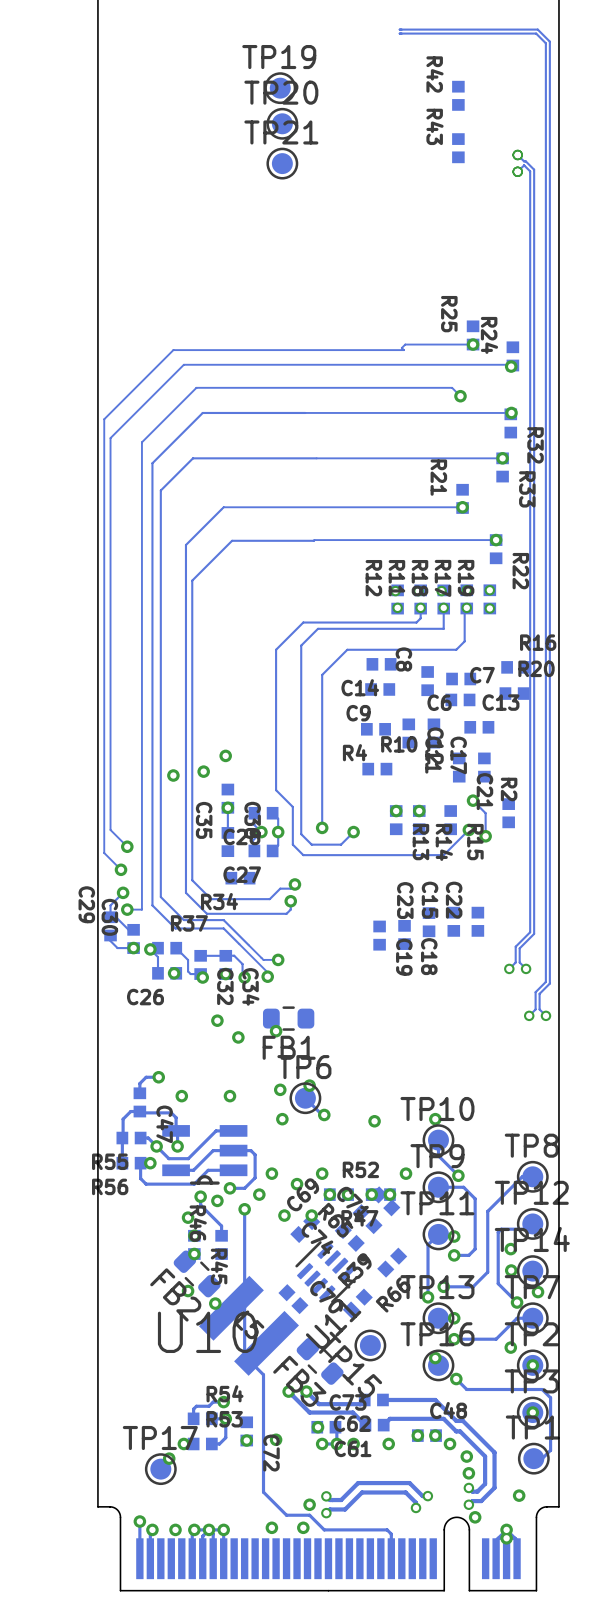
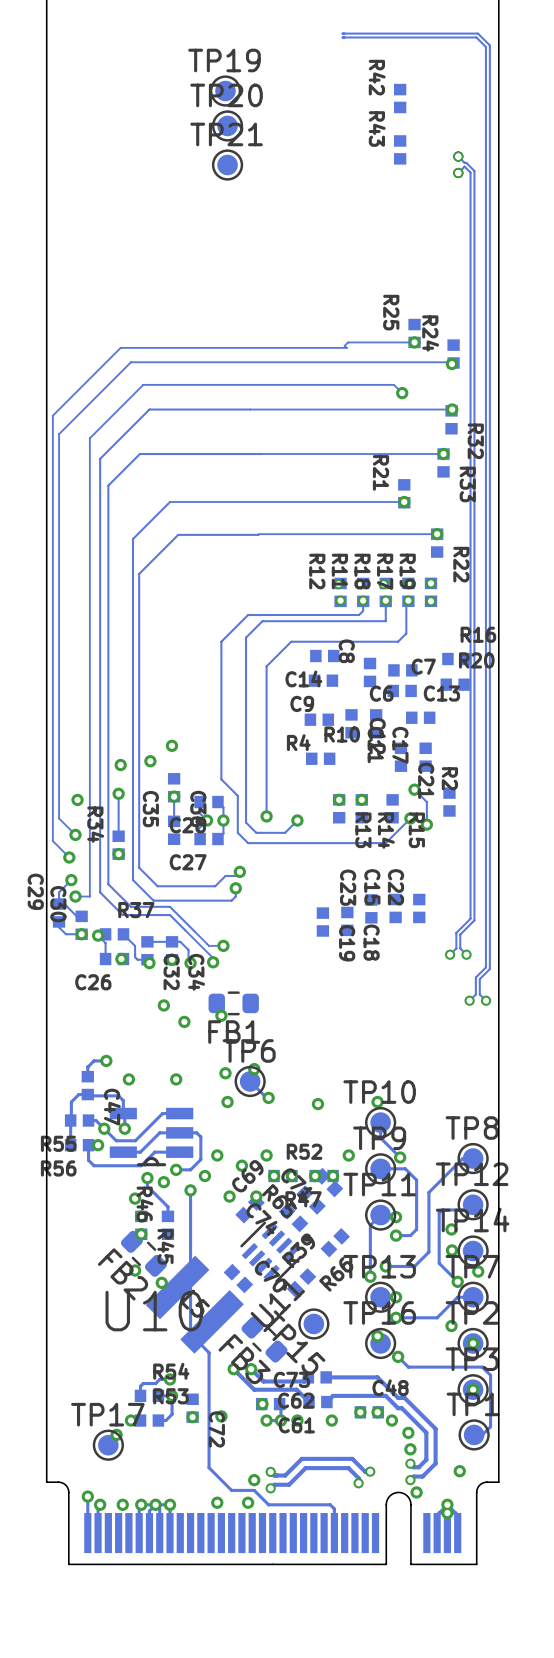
track: none -> (118, 793) (118, 836)
via: none -> (118, 793)
via: none -> (77, 799)
via: none -> (118, 854)
R34 rotation: 0° (240, 878) -> 90° clockwise (118, 845)
R34 position: (240, 878) -> (118, 845)

